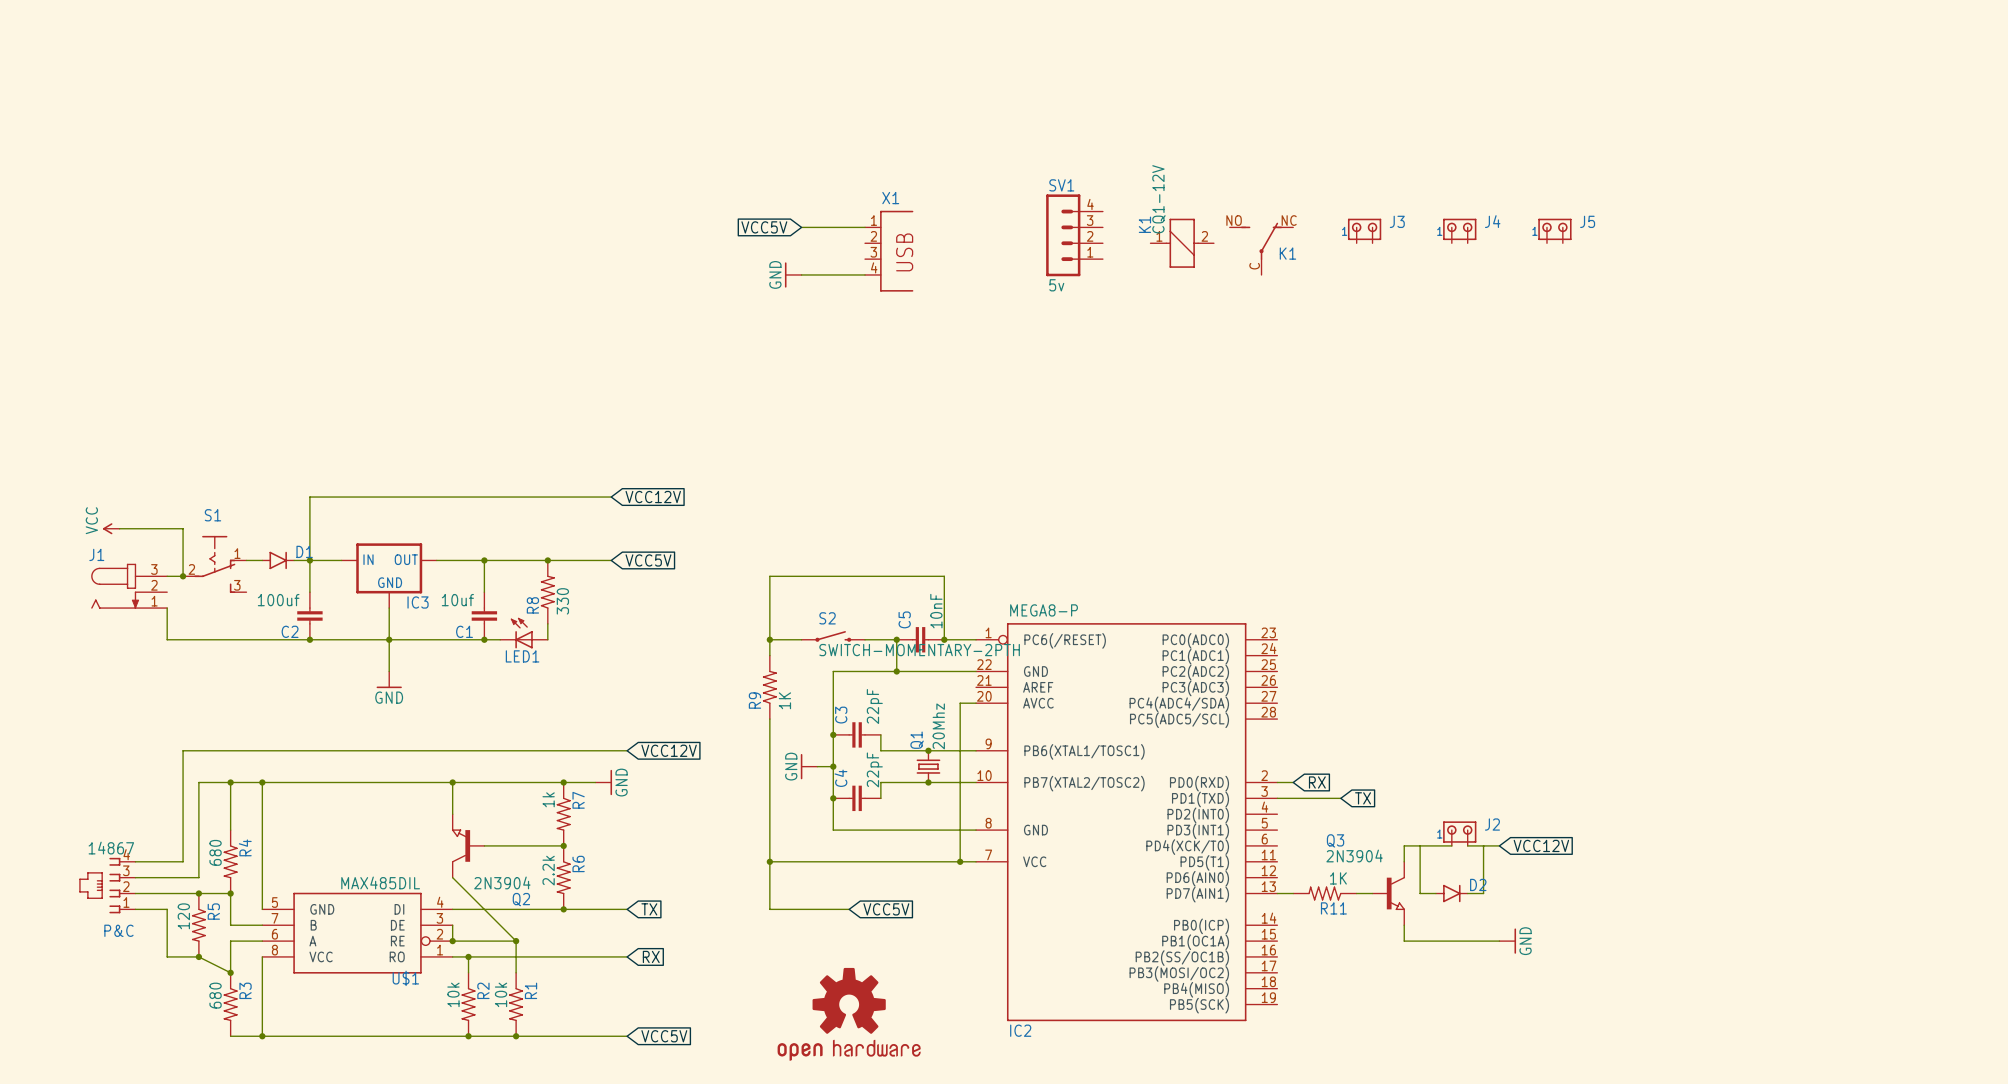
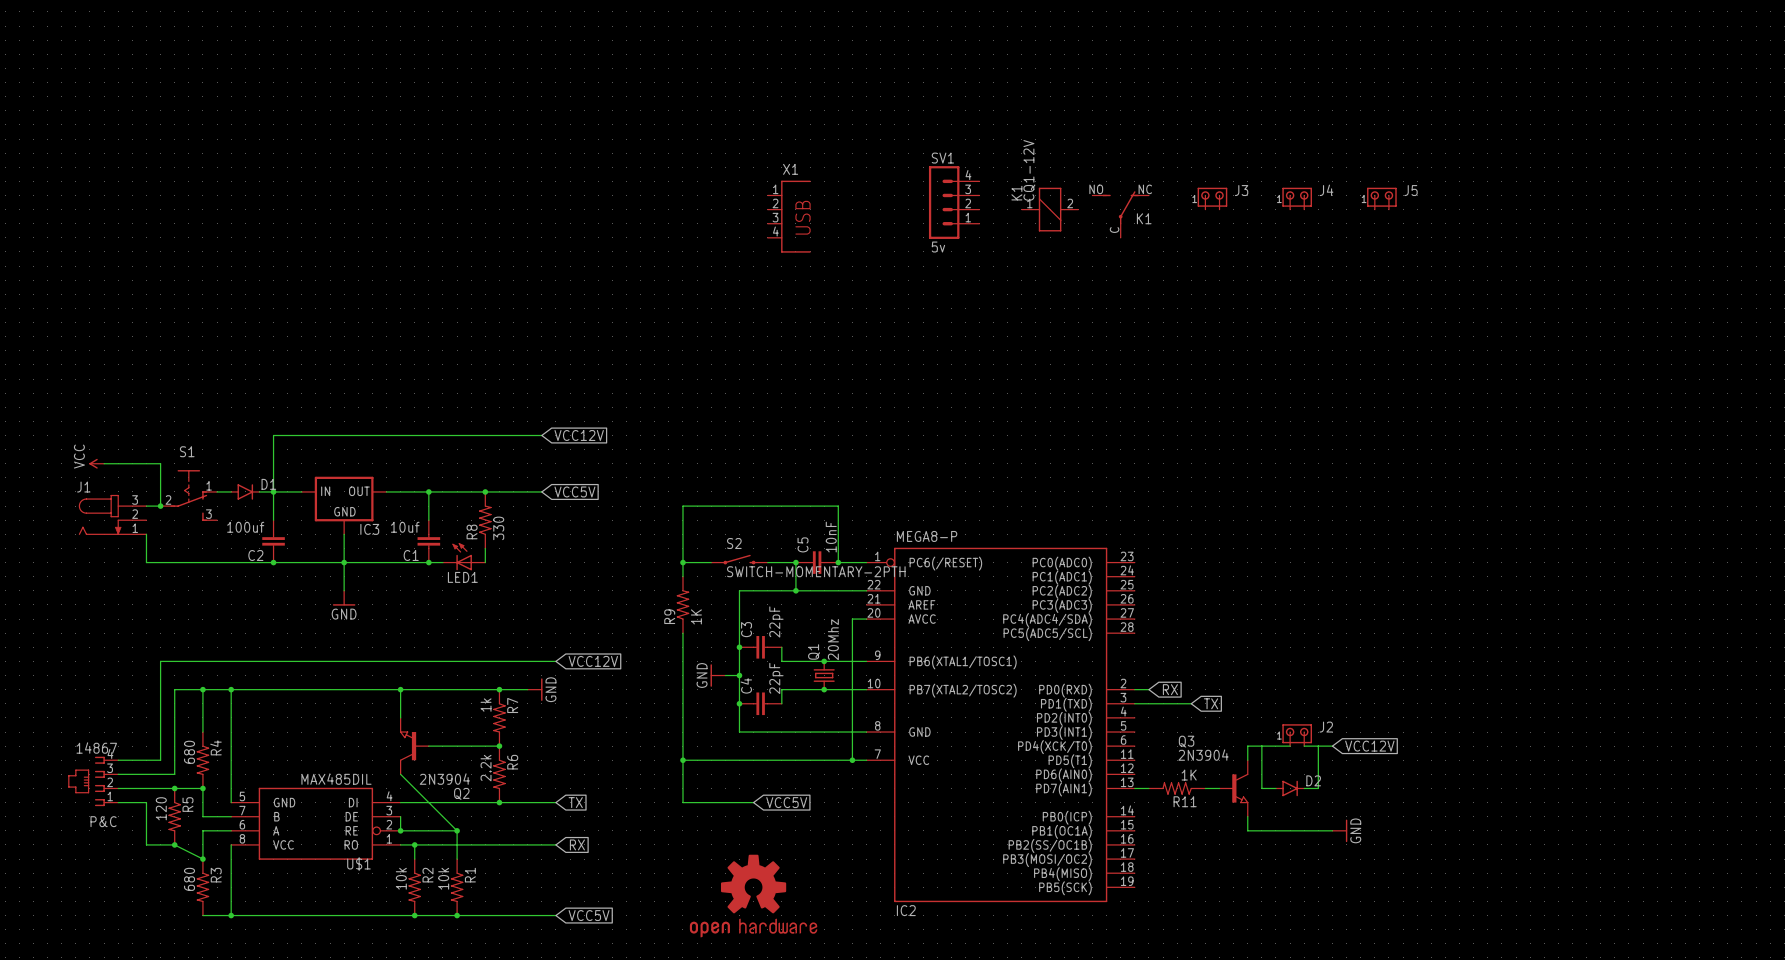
global label: VCC5V (764, 227) -> none
wire: (801, 227) (865, 227) -> none
power symbol: GND (793, 274) -> none
wire: (801, 274) (865, 274) -> none

